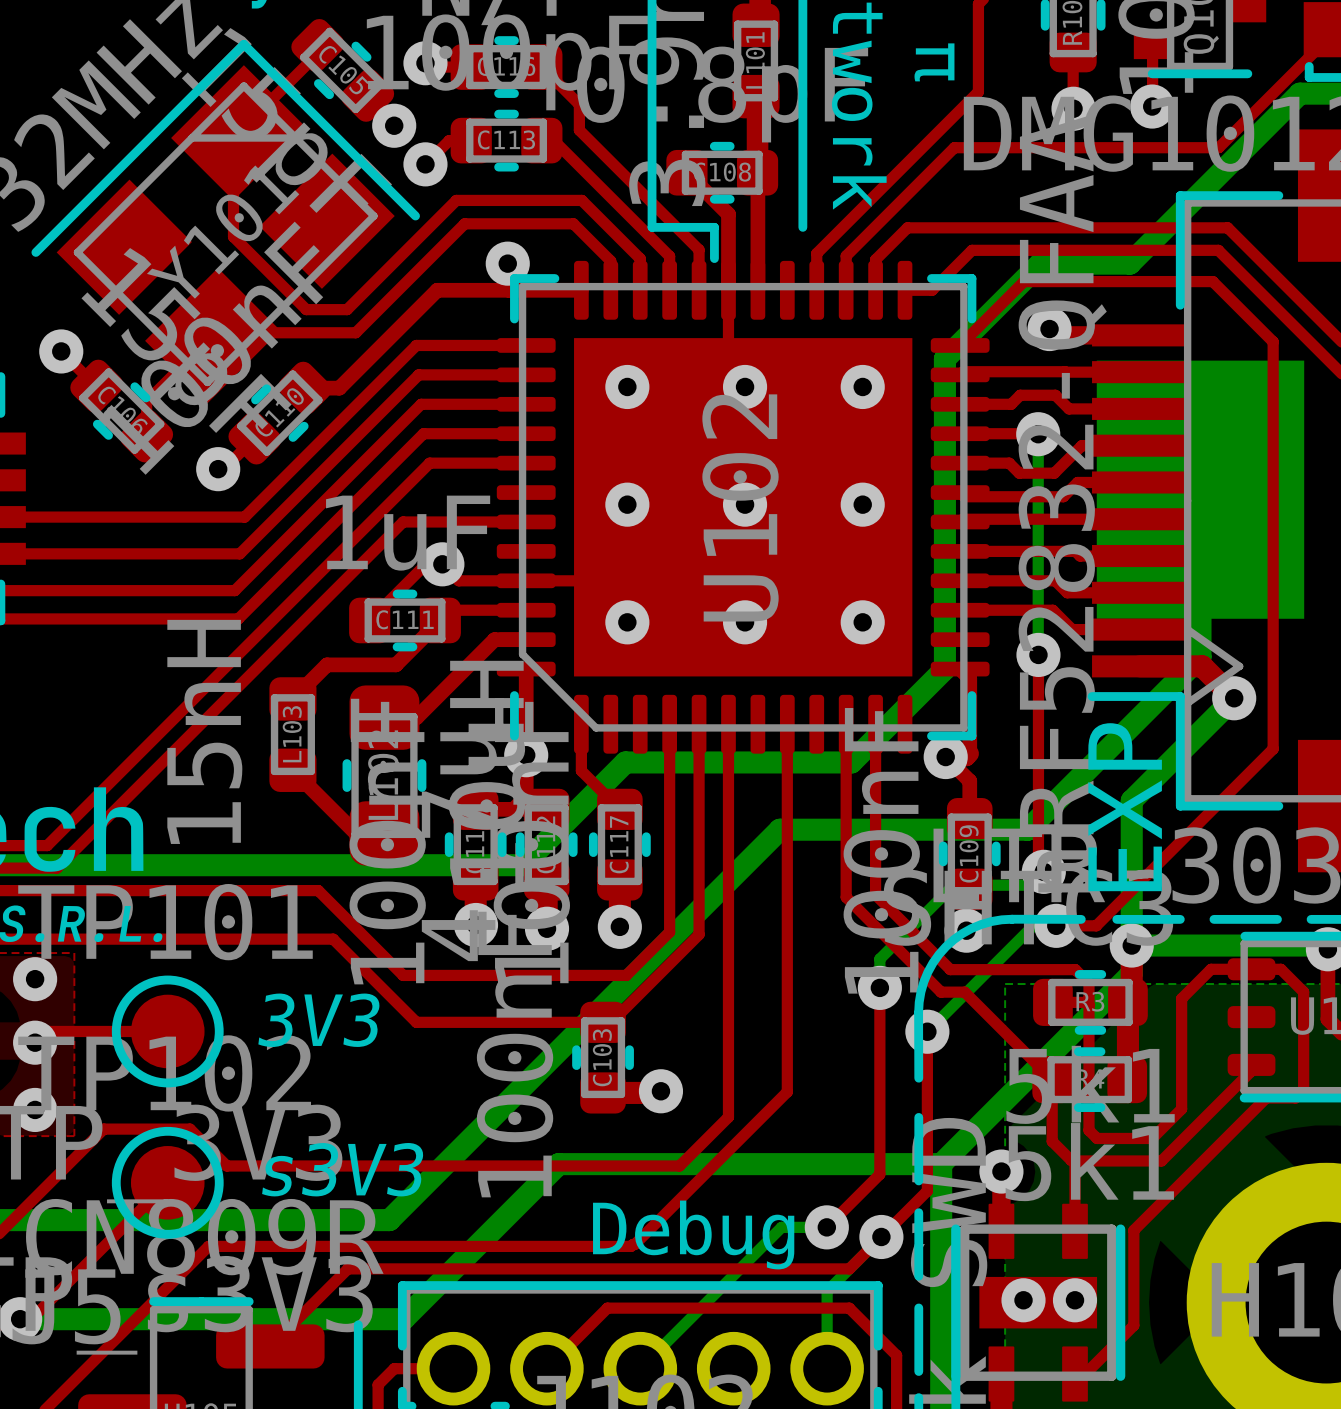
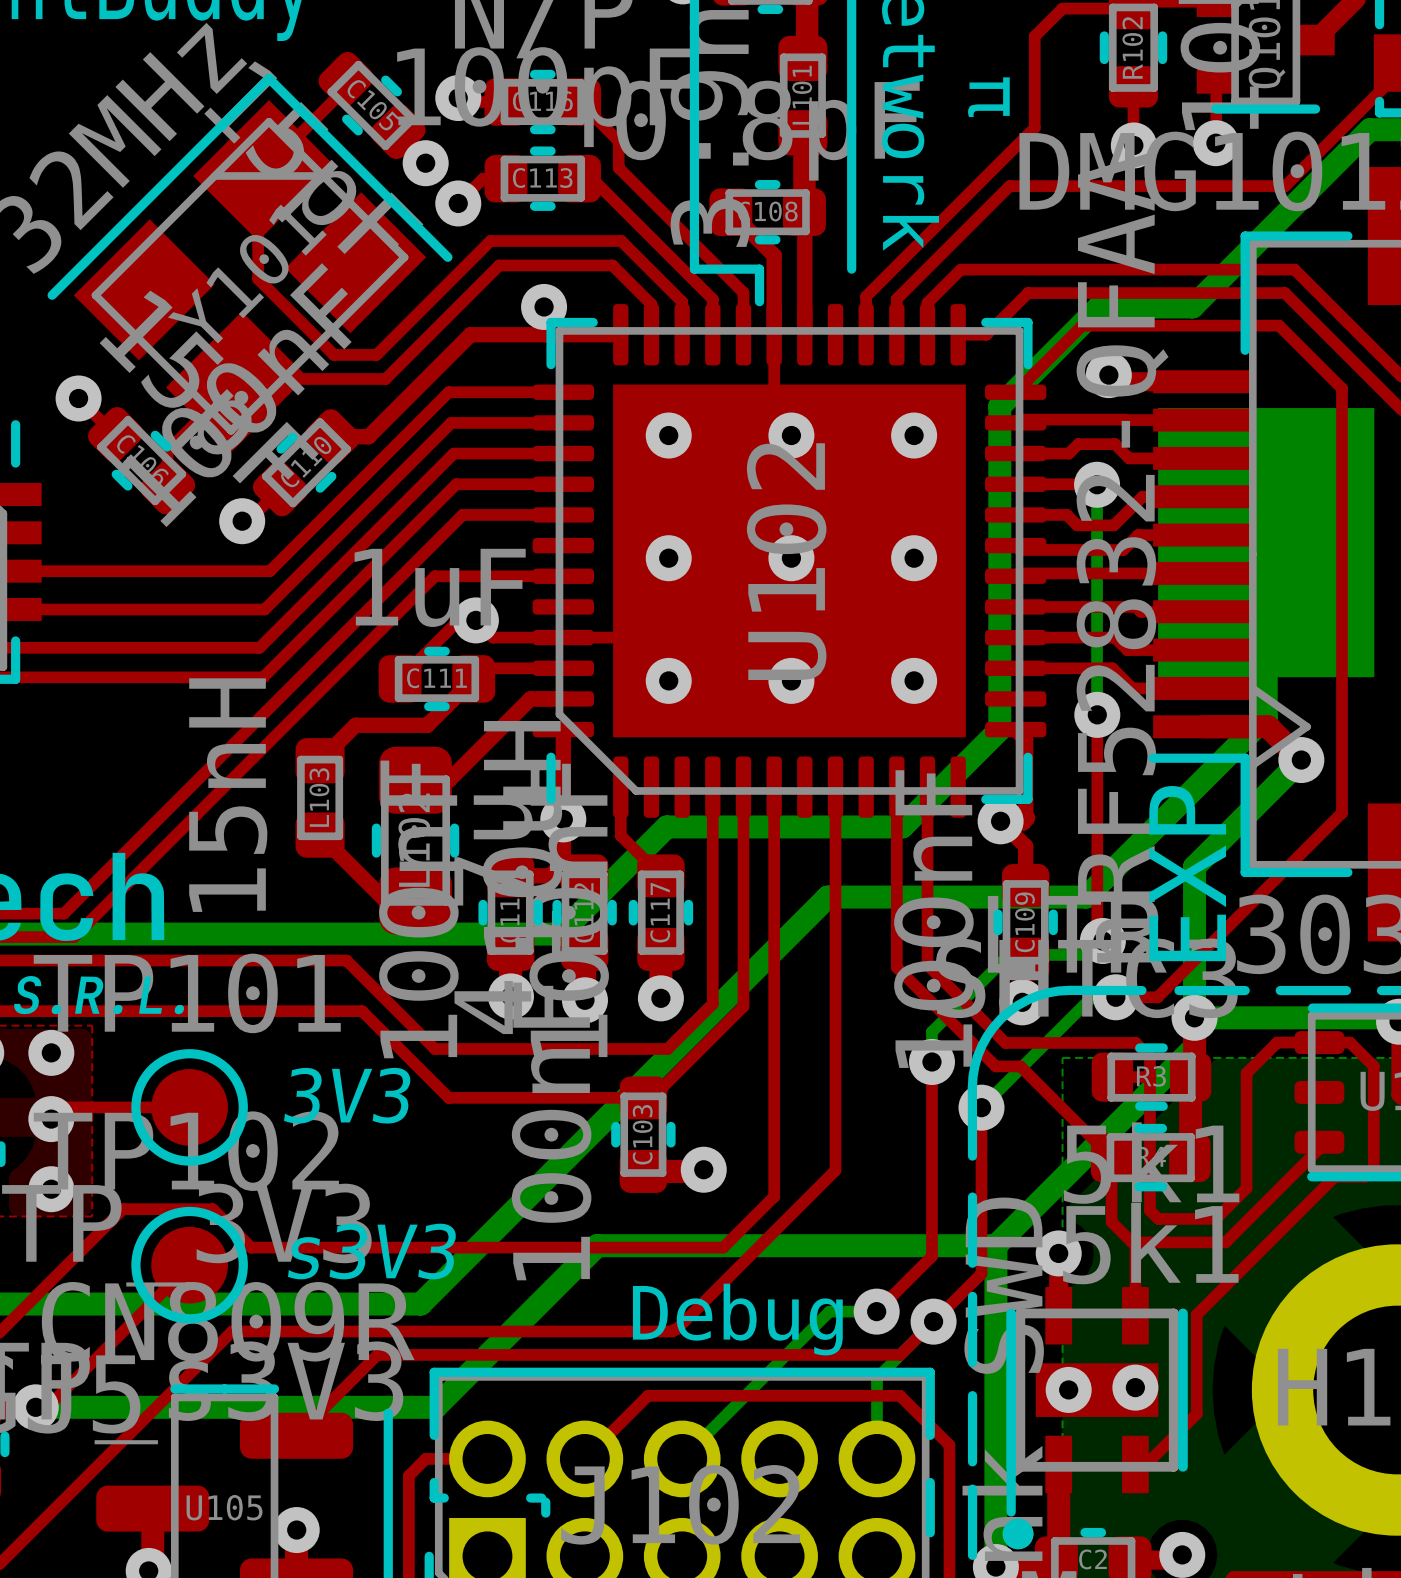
via position: (1023, 1300) -> (1068, 1389)

